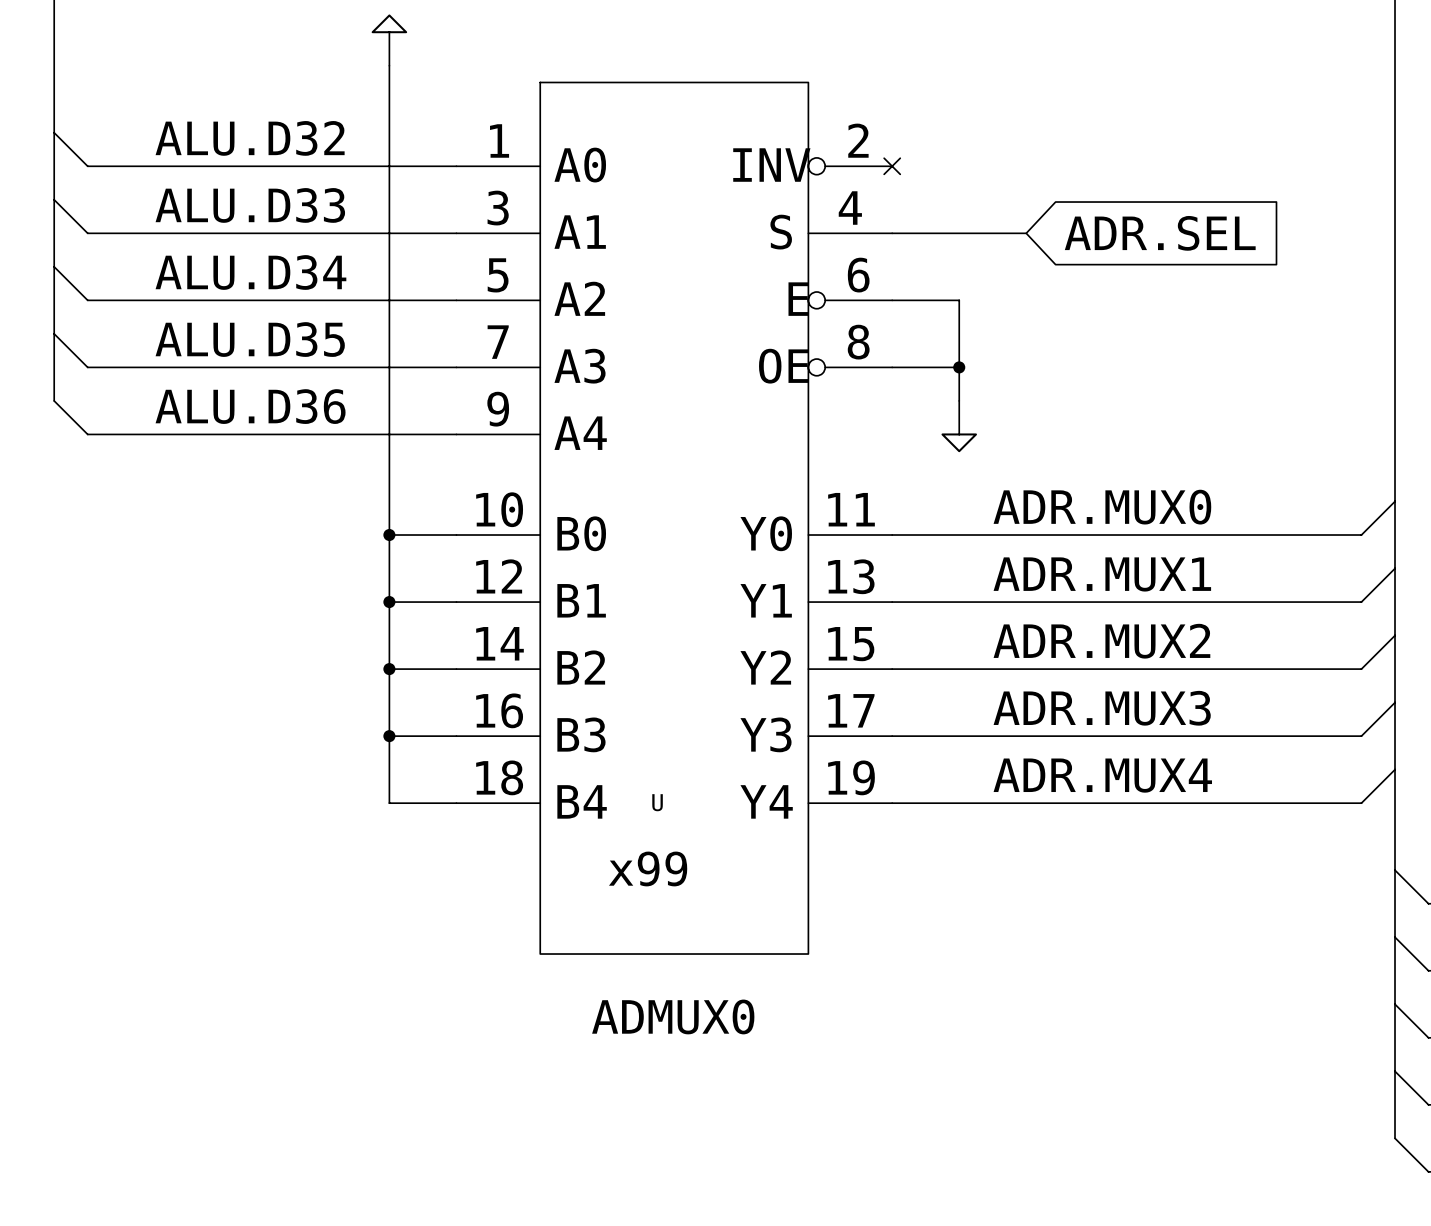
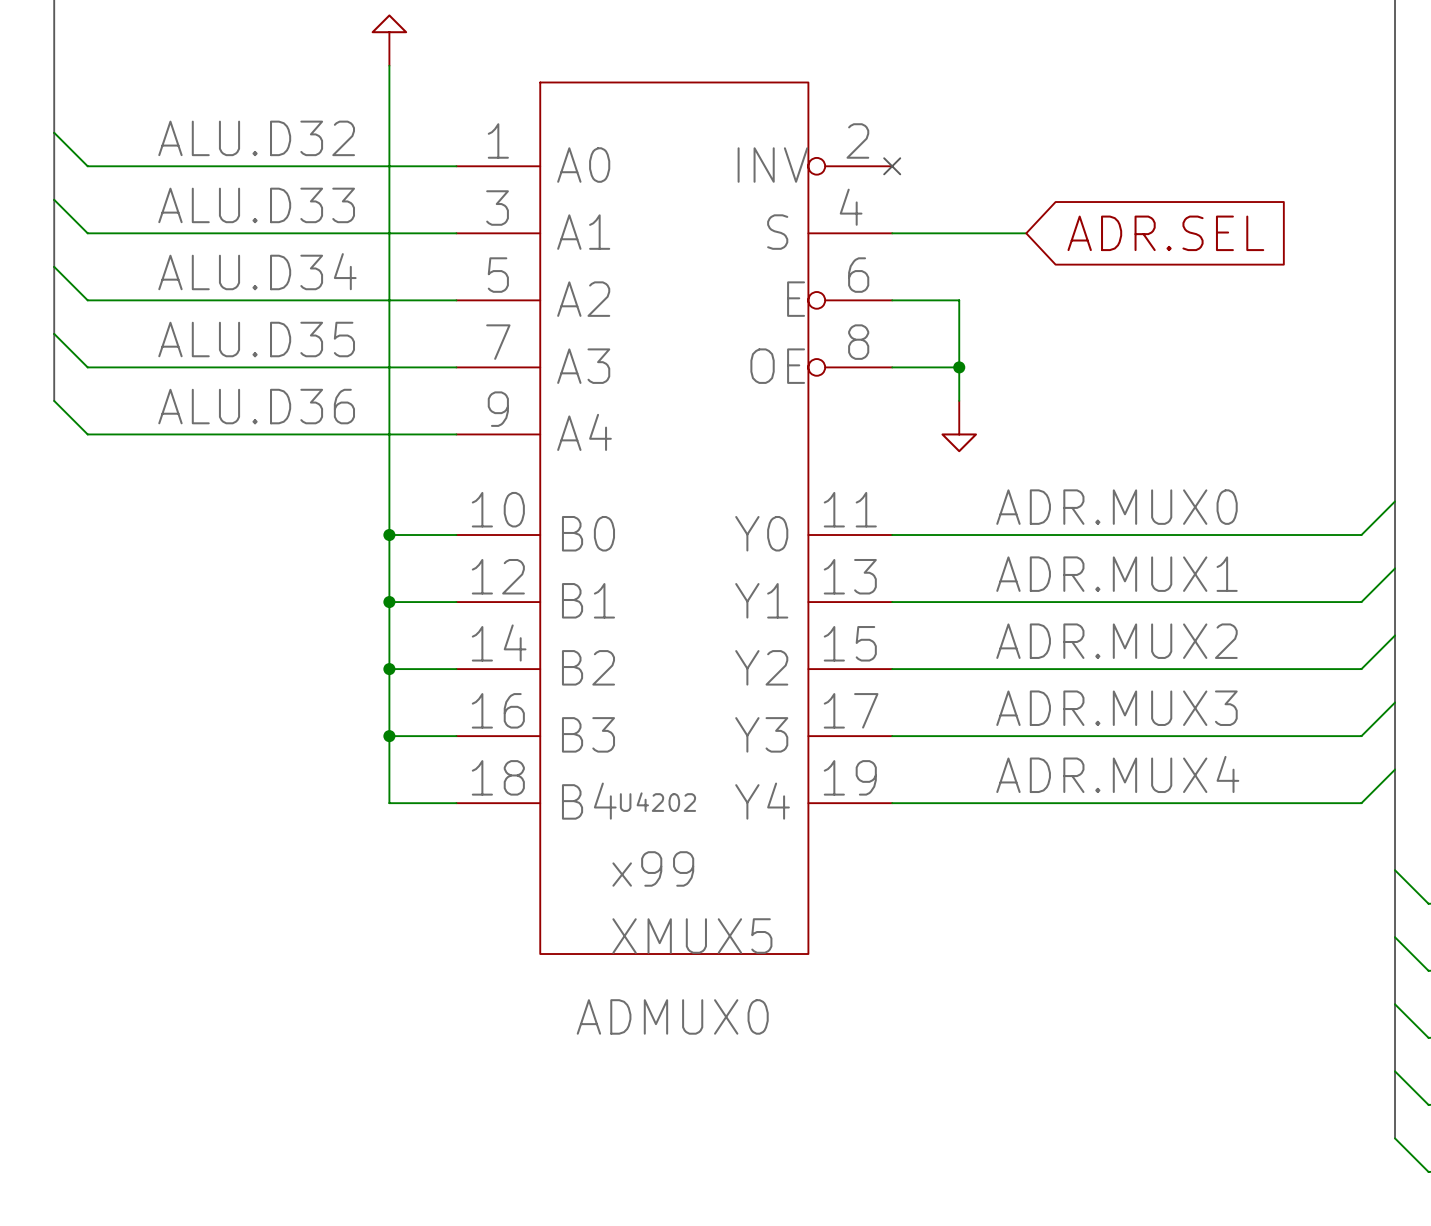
U name: U (657, 802) -> U4202 (657, 802)
U value: none -> XMUX5 (692, 935)

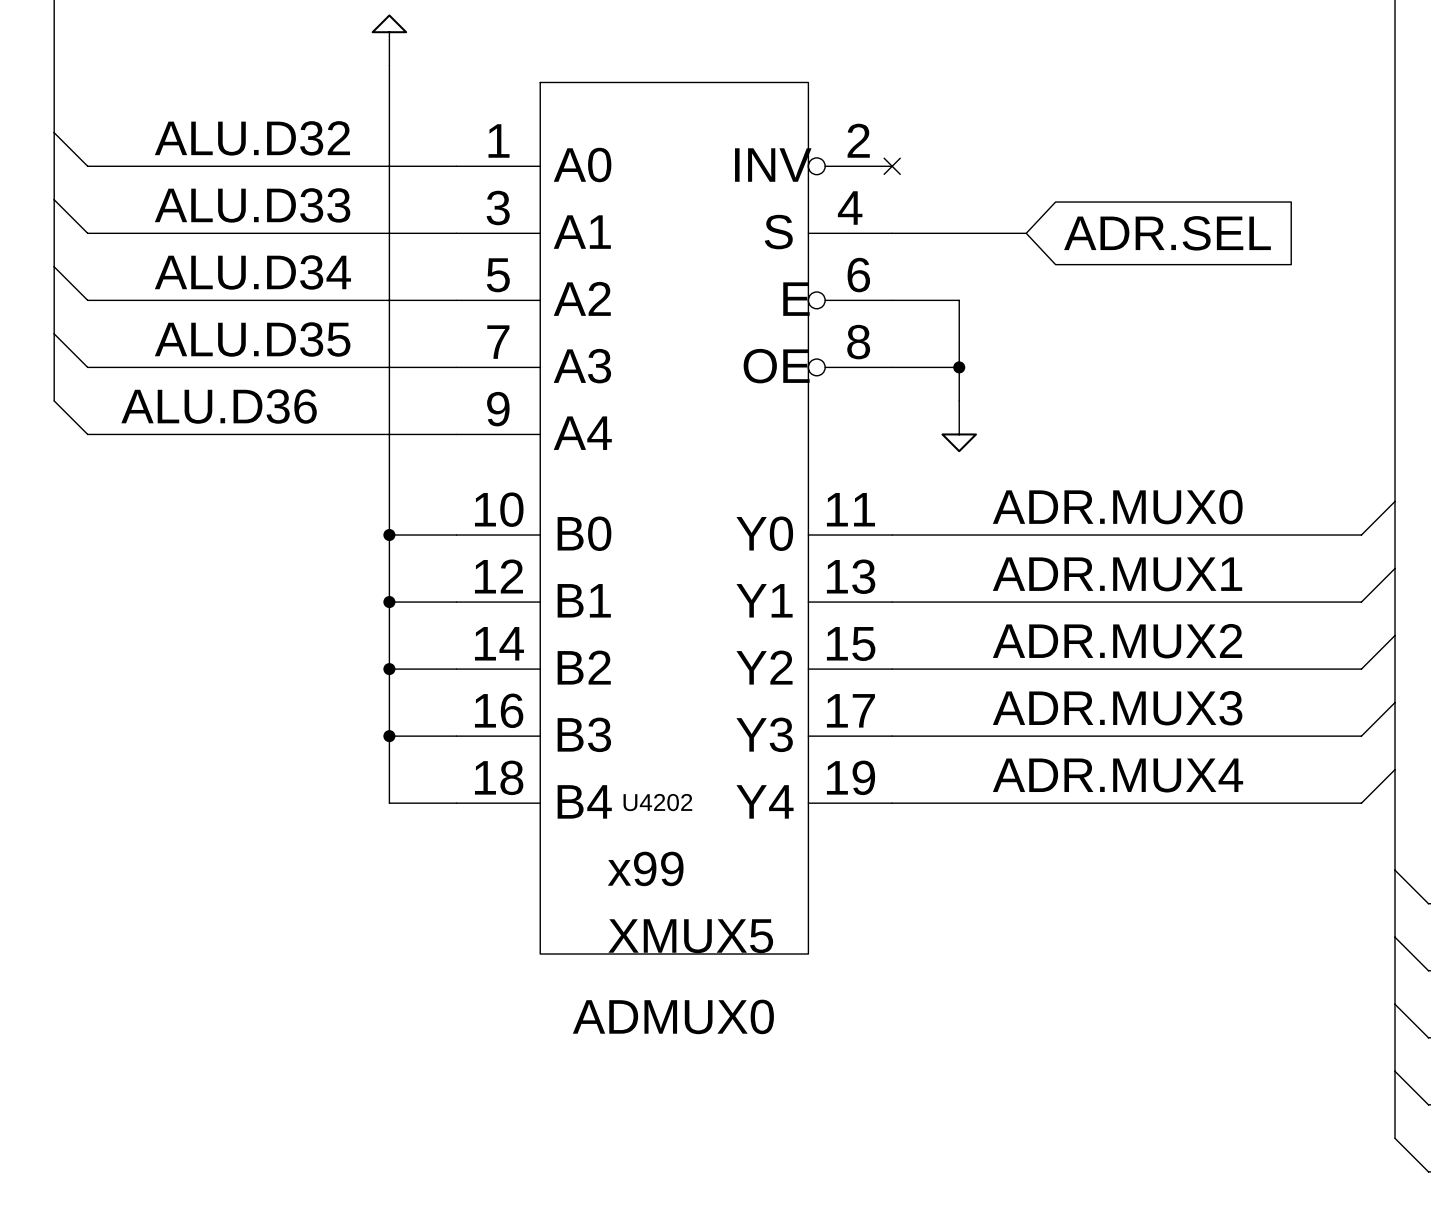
label position: ALU.D36 (256, 406) -> ALU.D36 (219, 406)

